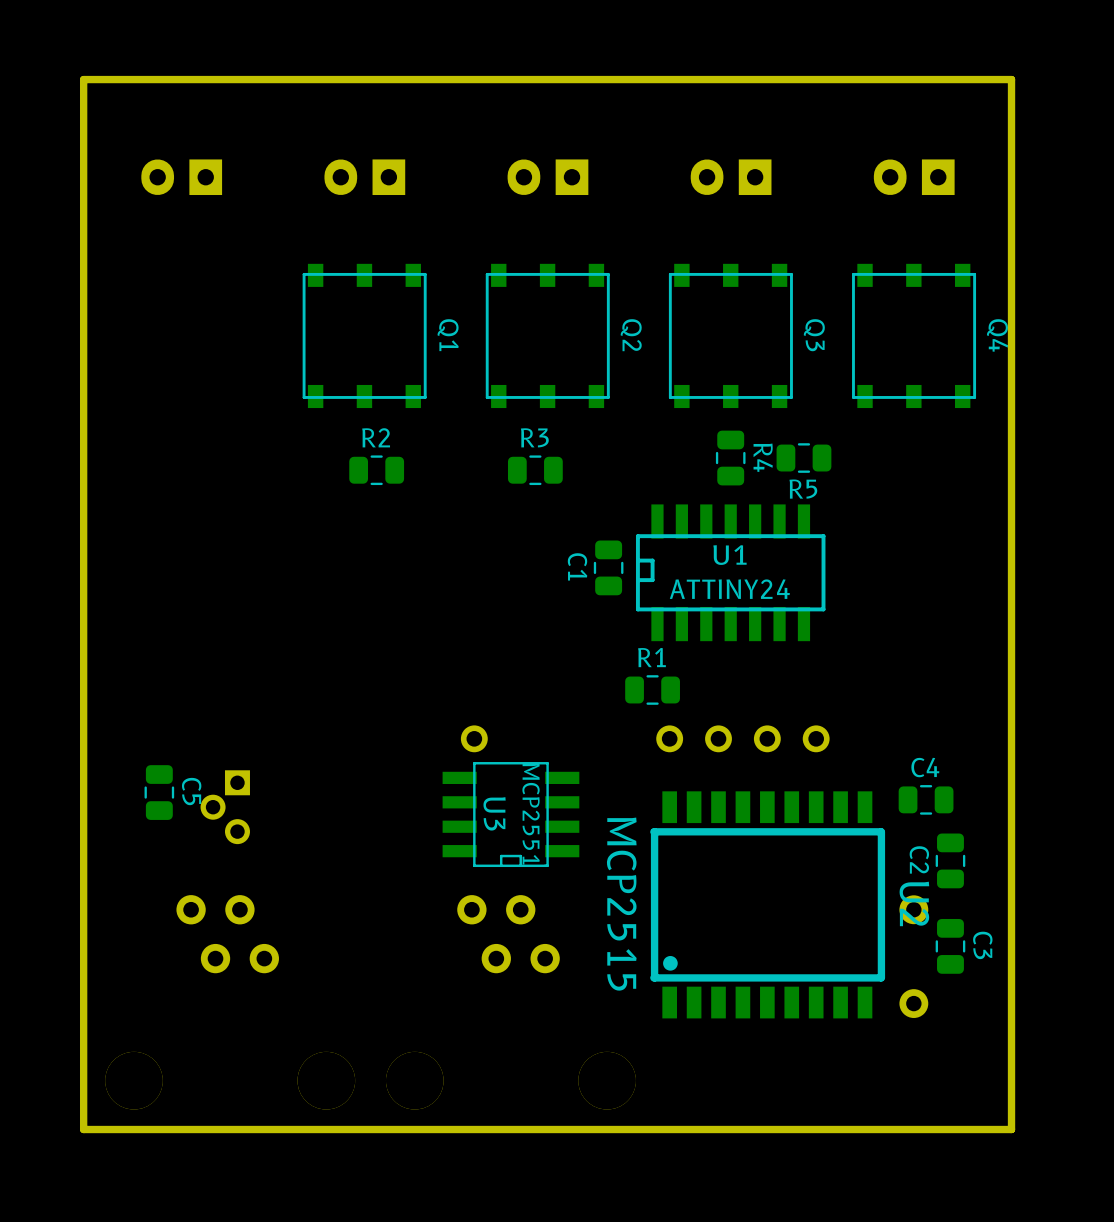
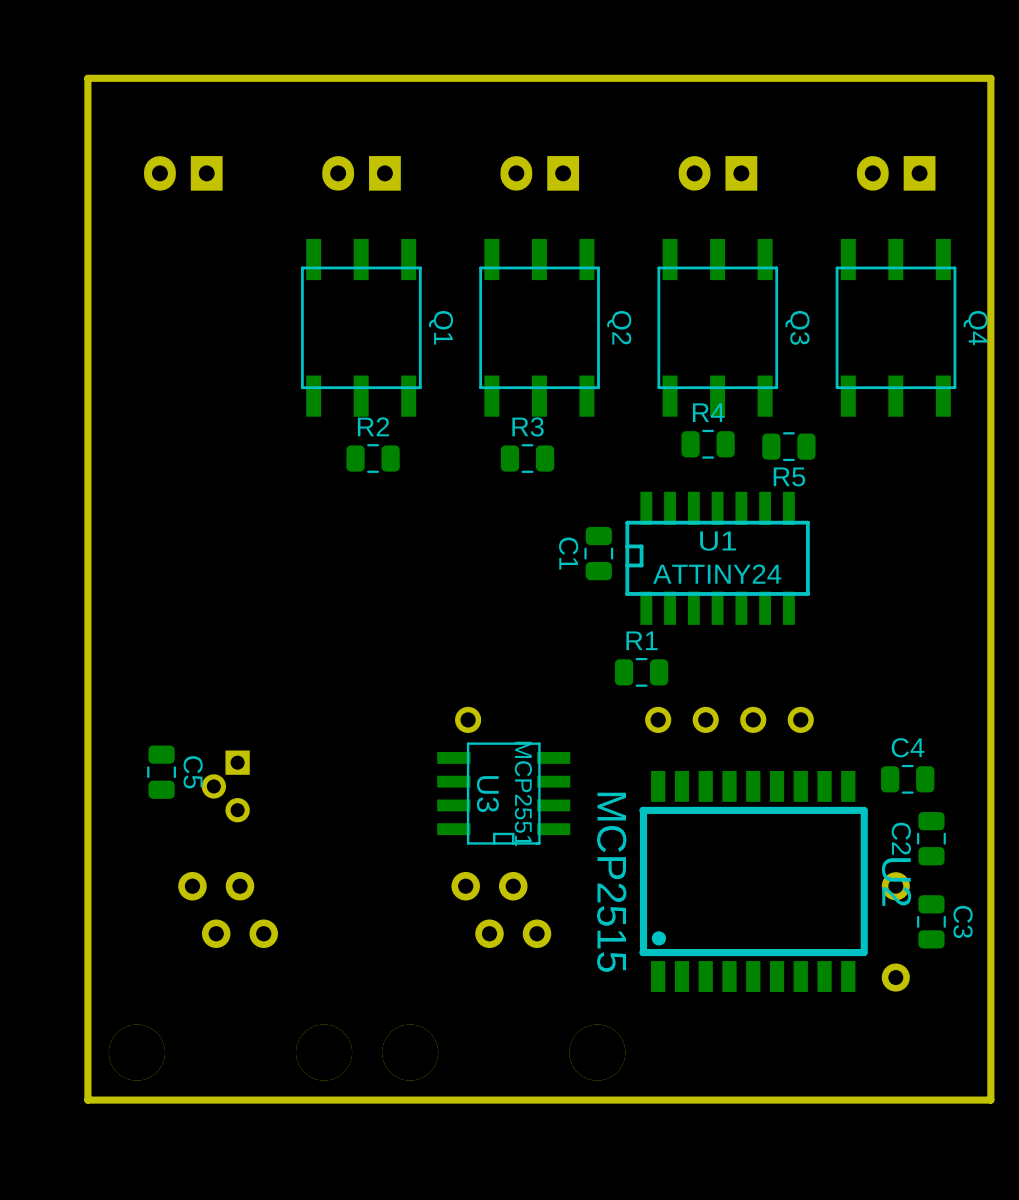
Q1 footprint: [302, 263, 427, 409] -> [301, 238, 422, 417]
Q2 footprint: [485, 263, 610, 409] -> [479, 238, 600, 417]
Q3 footprint: [668, 263, 793, 409] -> [657, 238, 779, 417]
Q4 footprint: [852, 263, 977, 409] -> [835, 238, 957, 417]
R4 name position: R4 (763, 457) -> R4 (708, 412)
R4 rotation: 0° (730, 458) -> 90° clockwise (708, 444)

